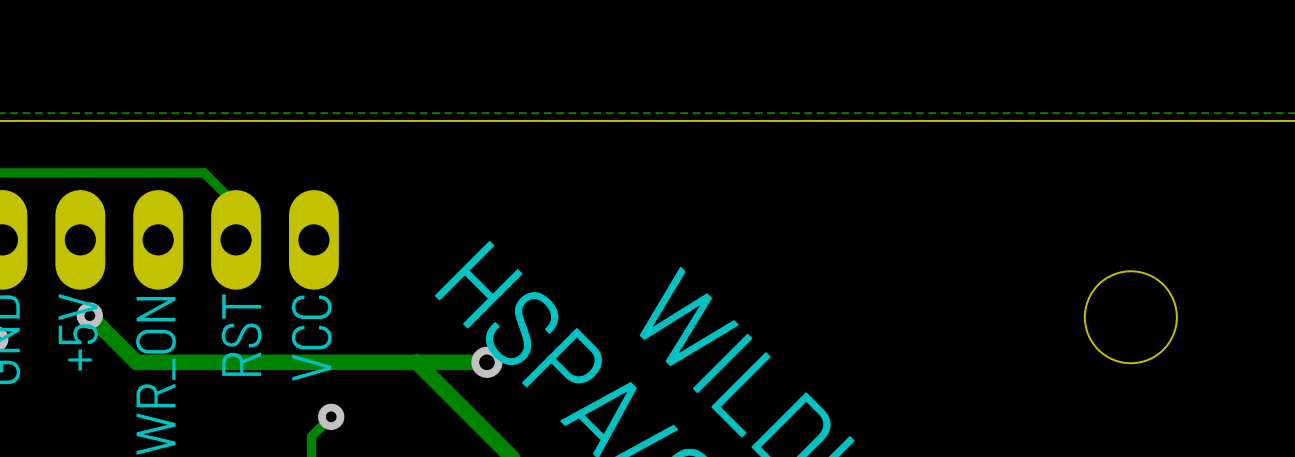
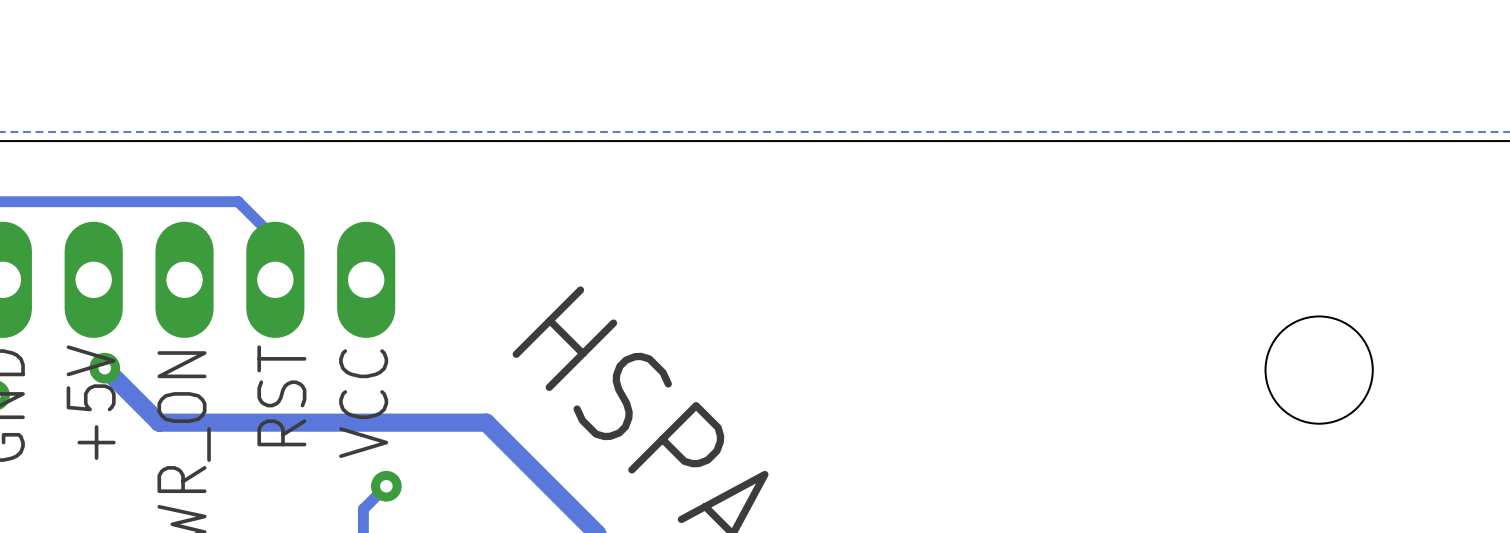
track: (486, 362) (416, 362) -> none
via: (486, 362) -> none

